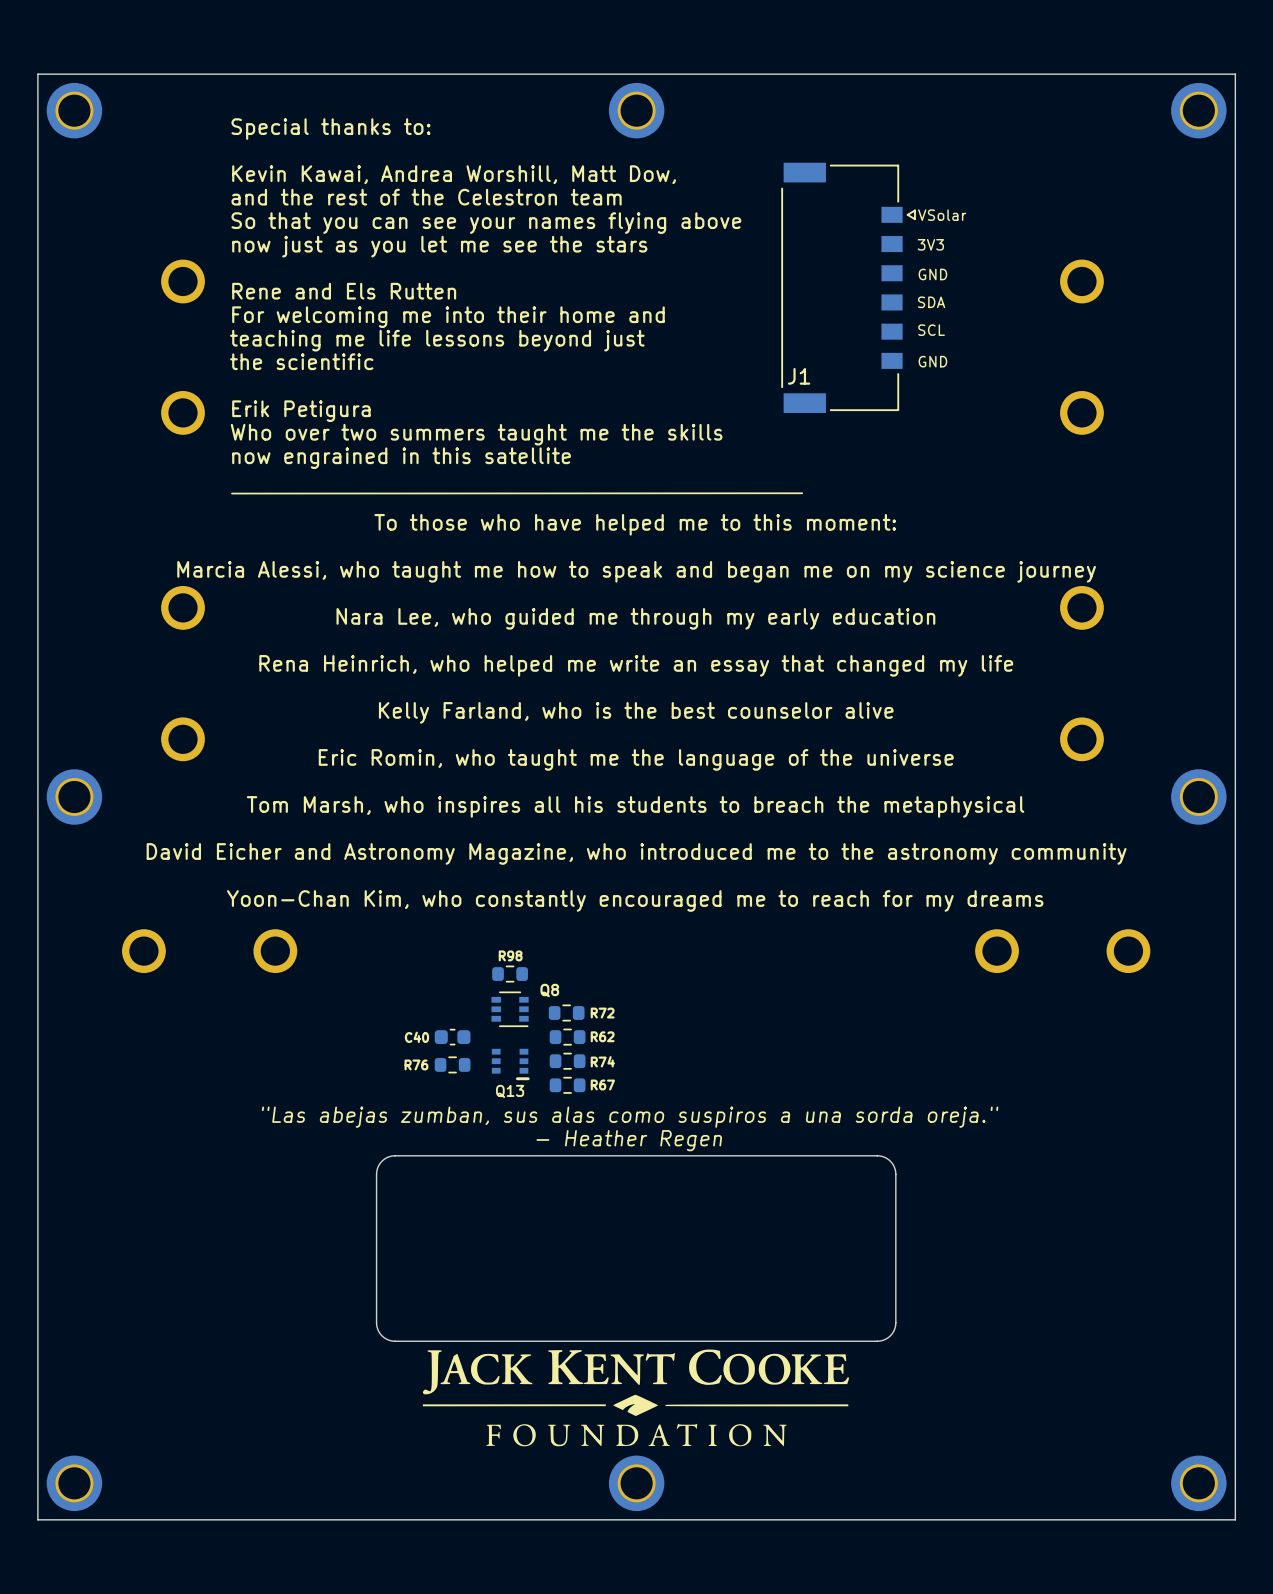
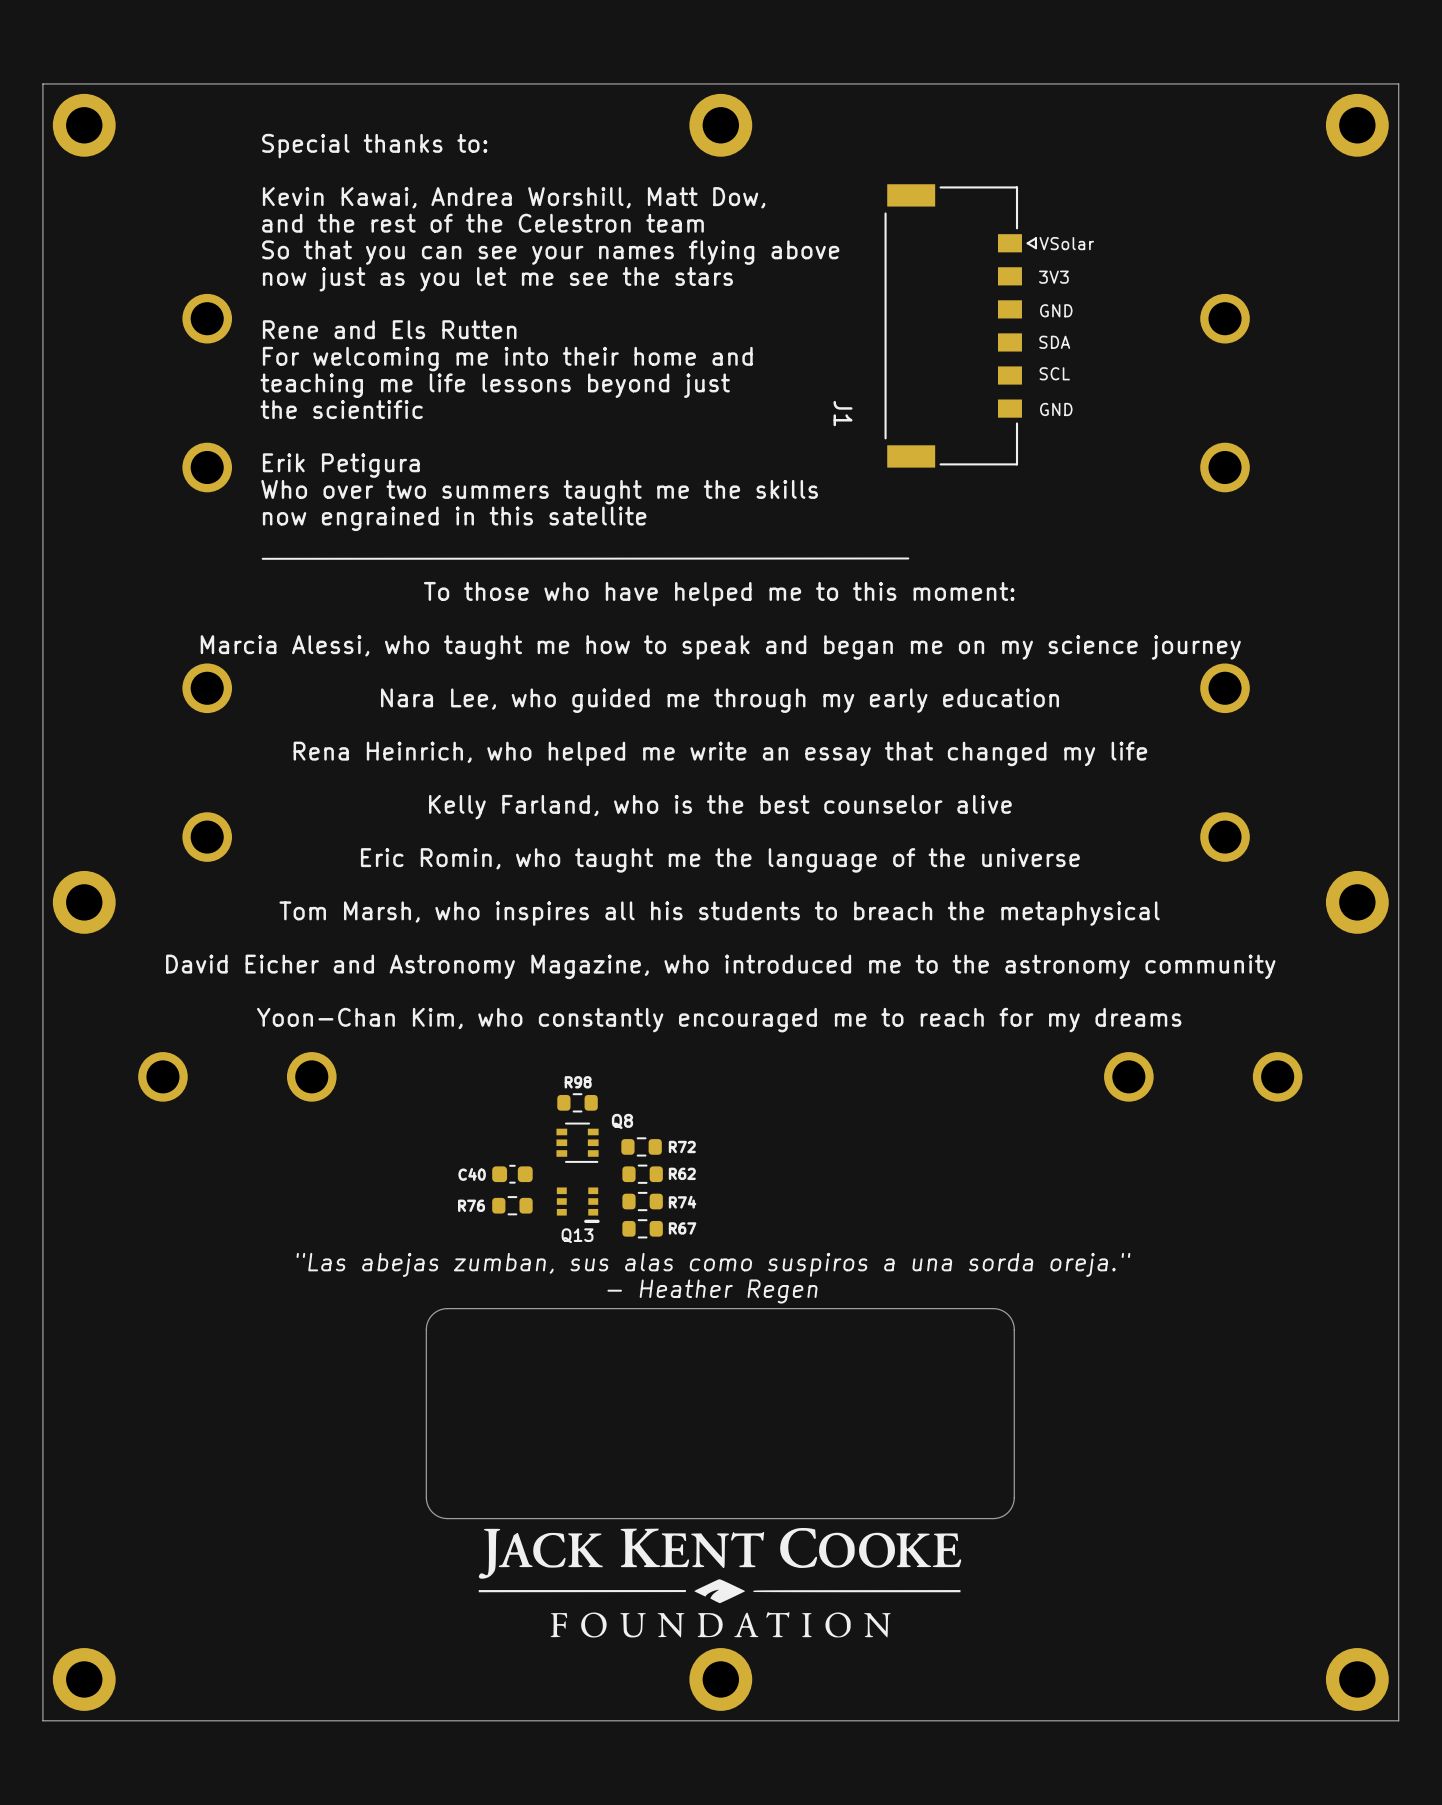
J1 name rotation: 0° (799, 376) -> 90° clockwise (843, 413)
J1 name position: J1 (799, 376) -> J1 (843, 413)

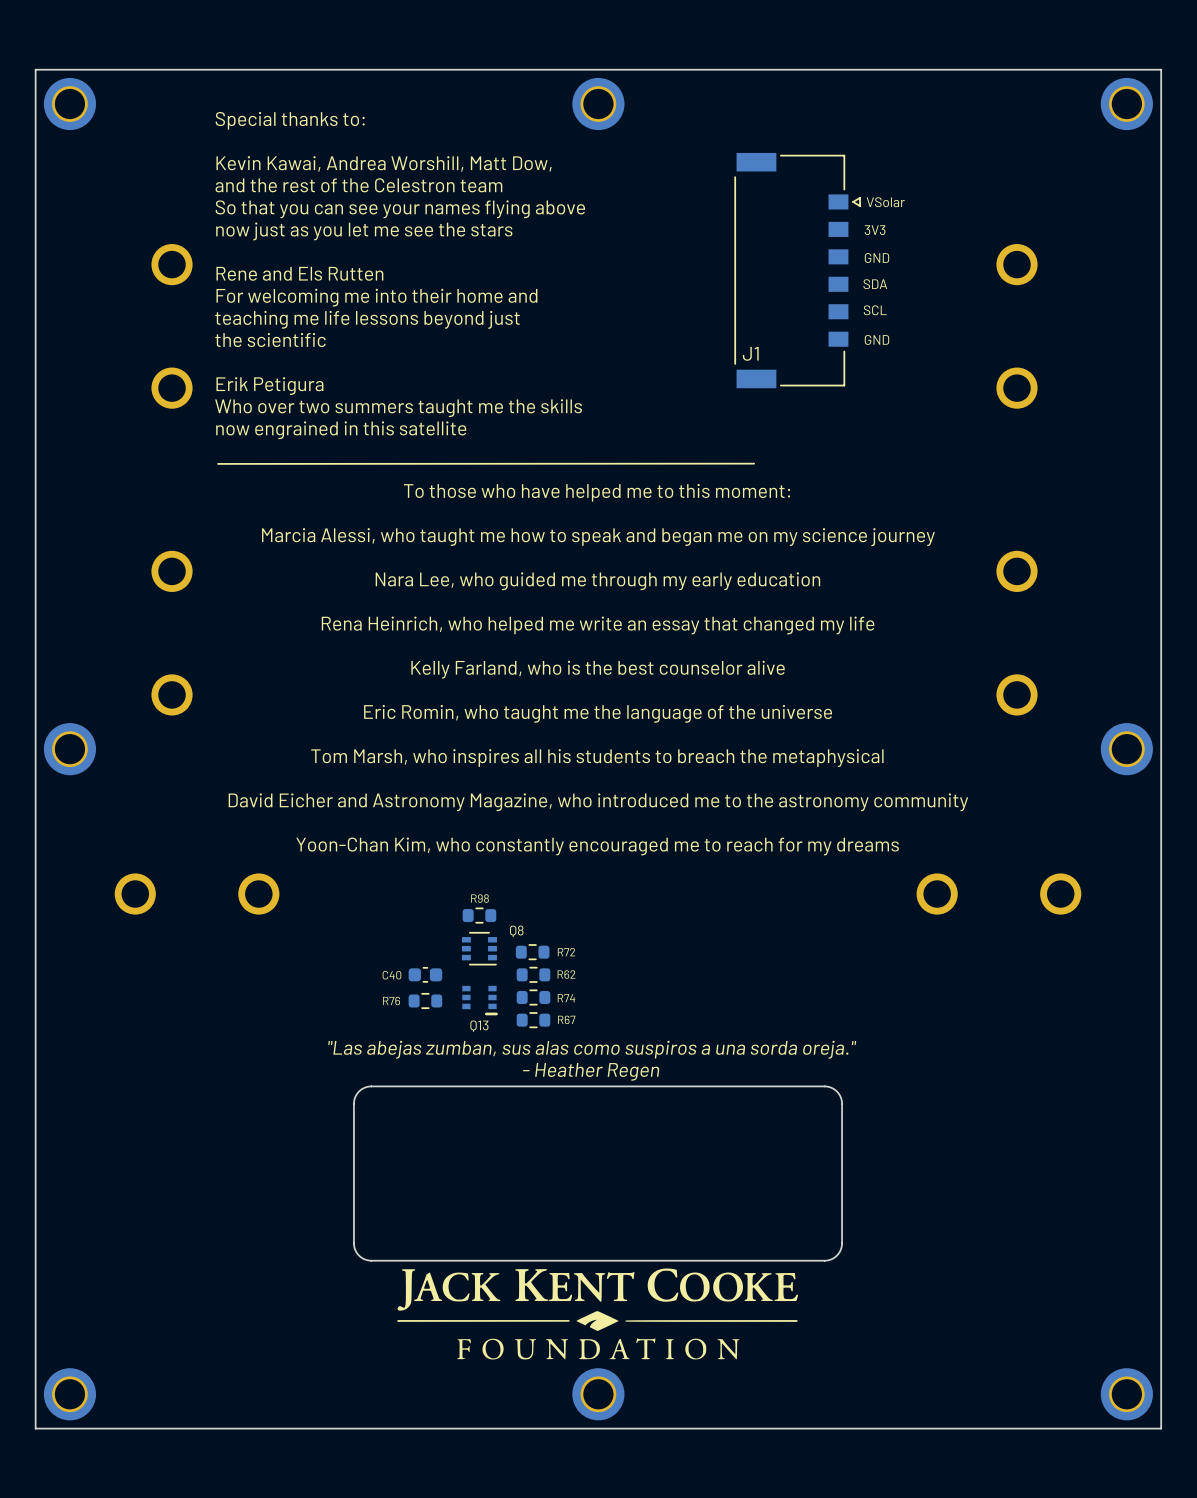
J1 name rotation: 0° (843, 413) -> 90° counterclockwise (750, 353)
J1 name position: J1 (843, 413) -> J1 (750, 353)

